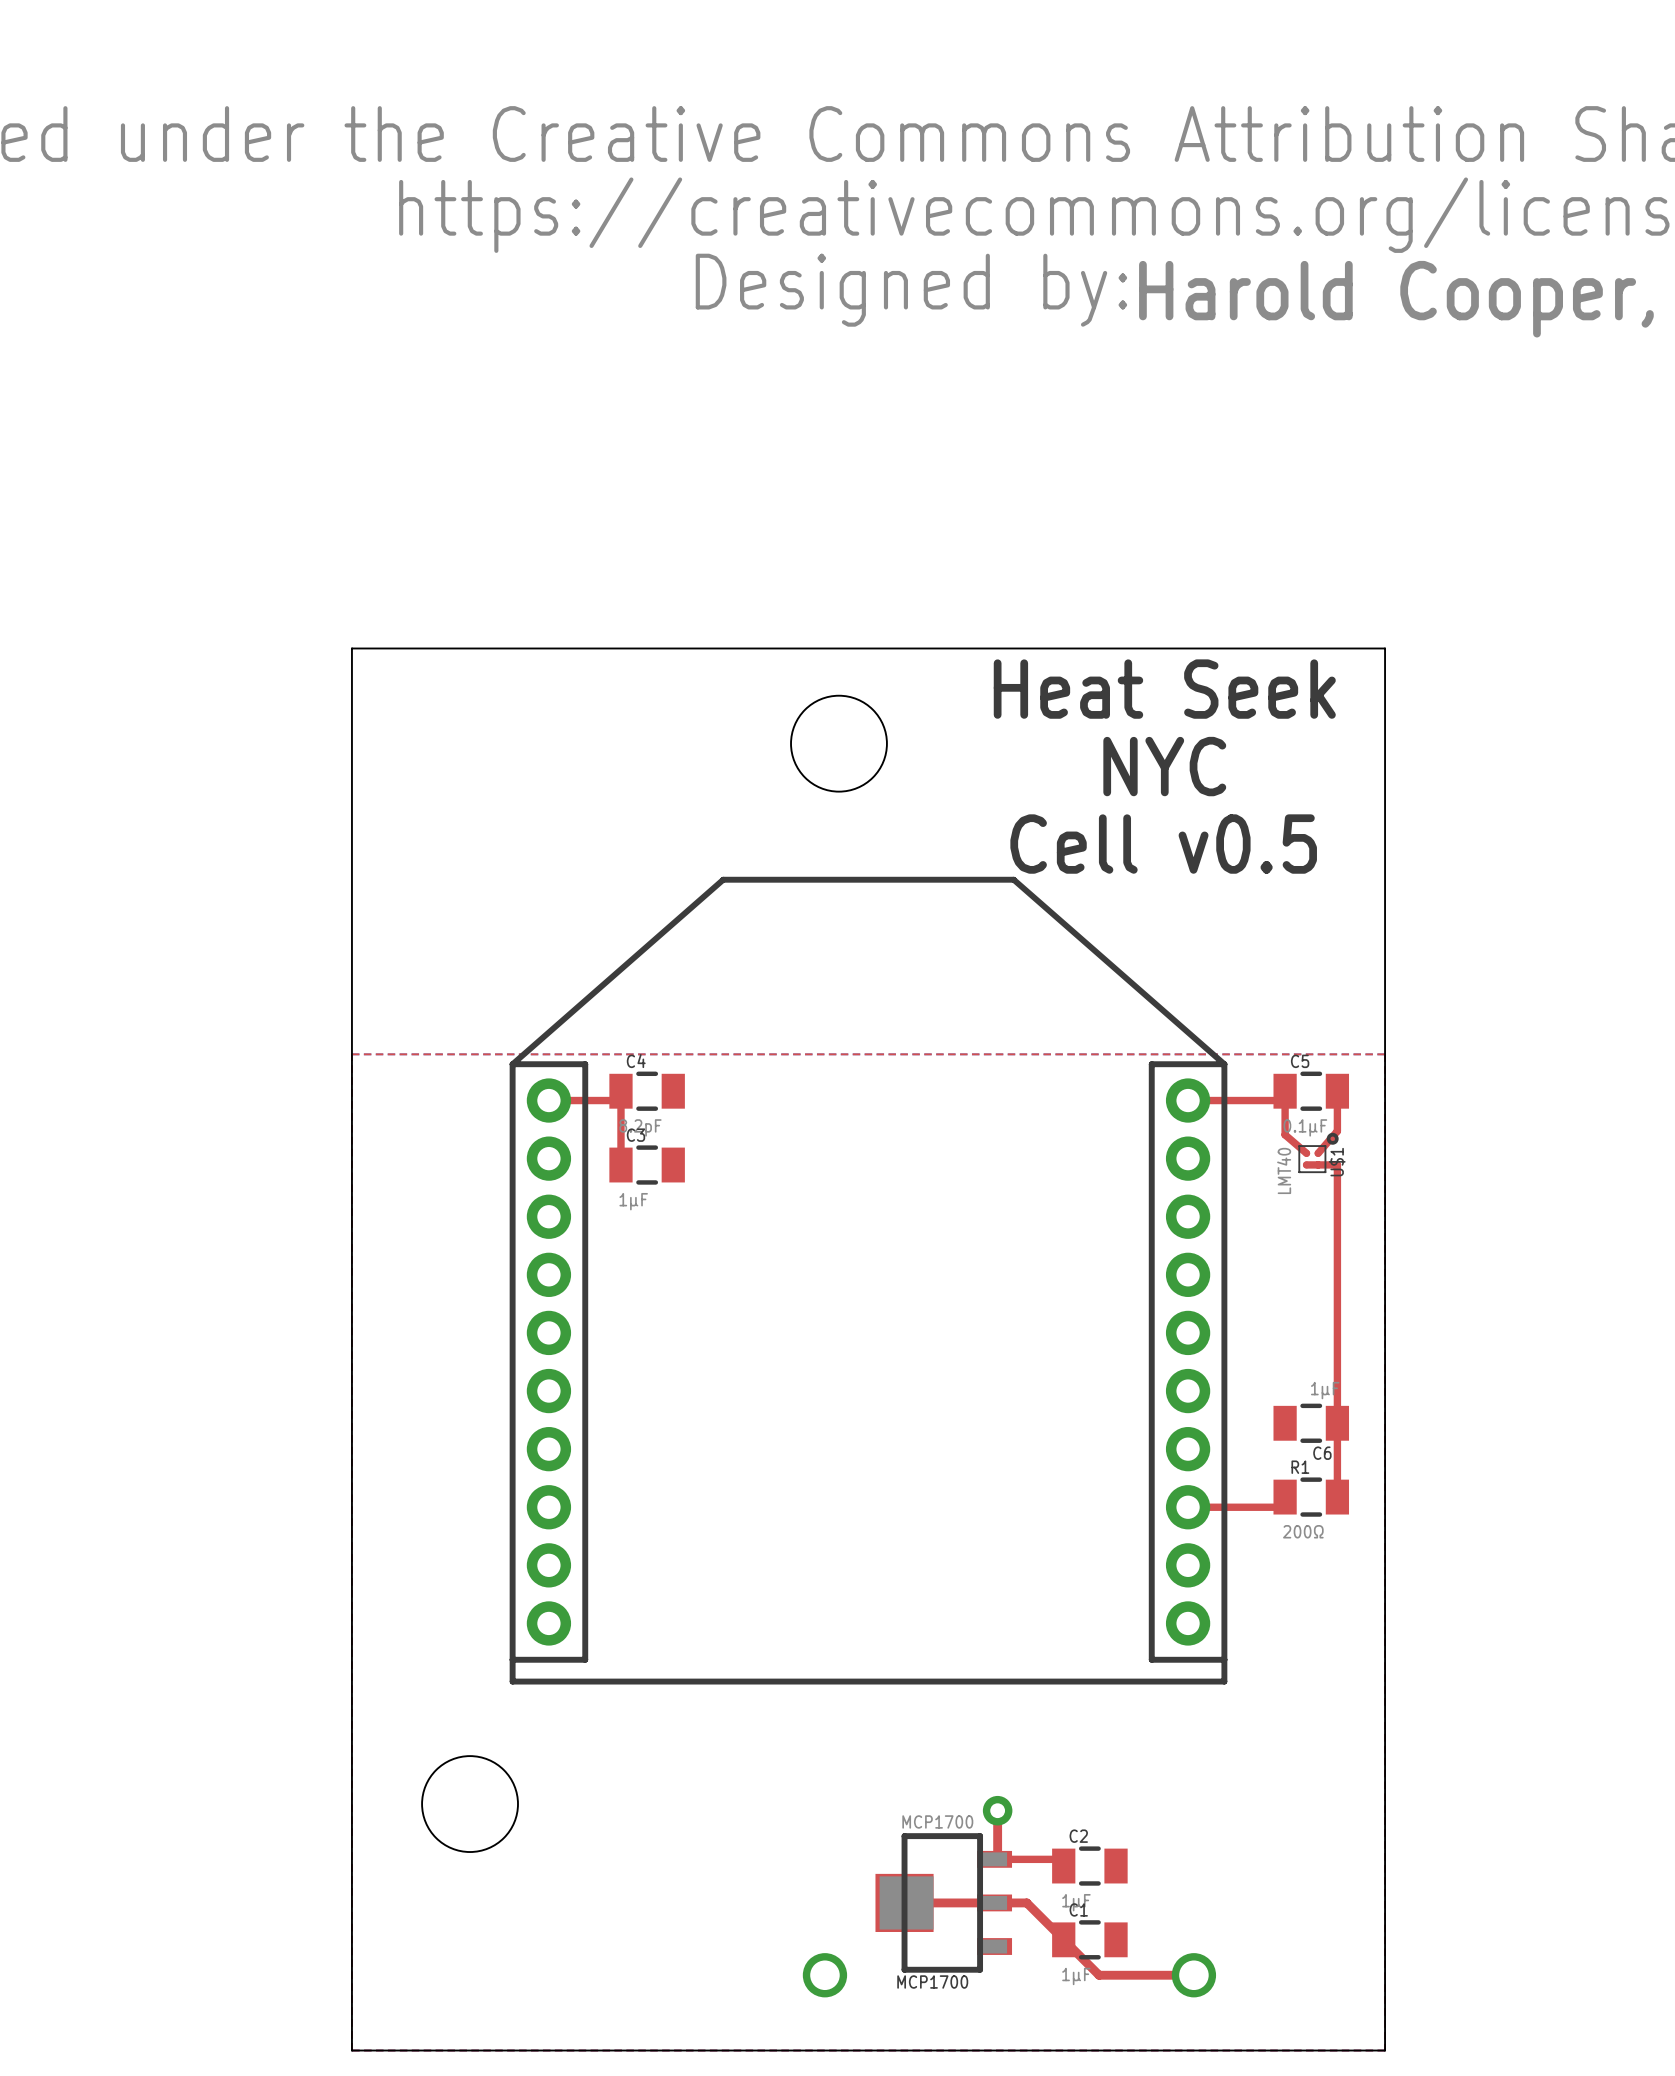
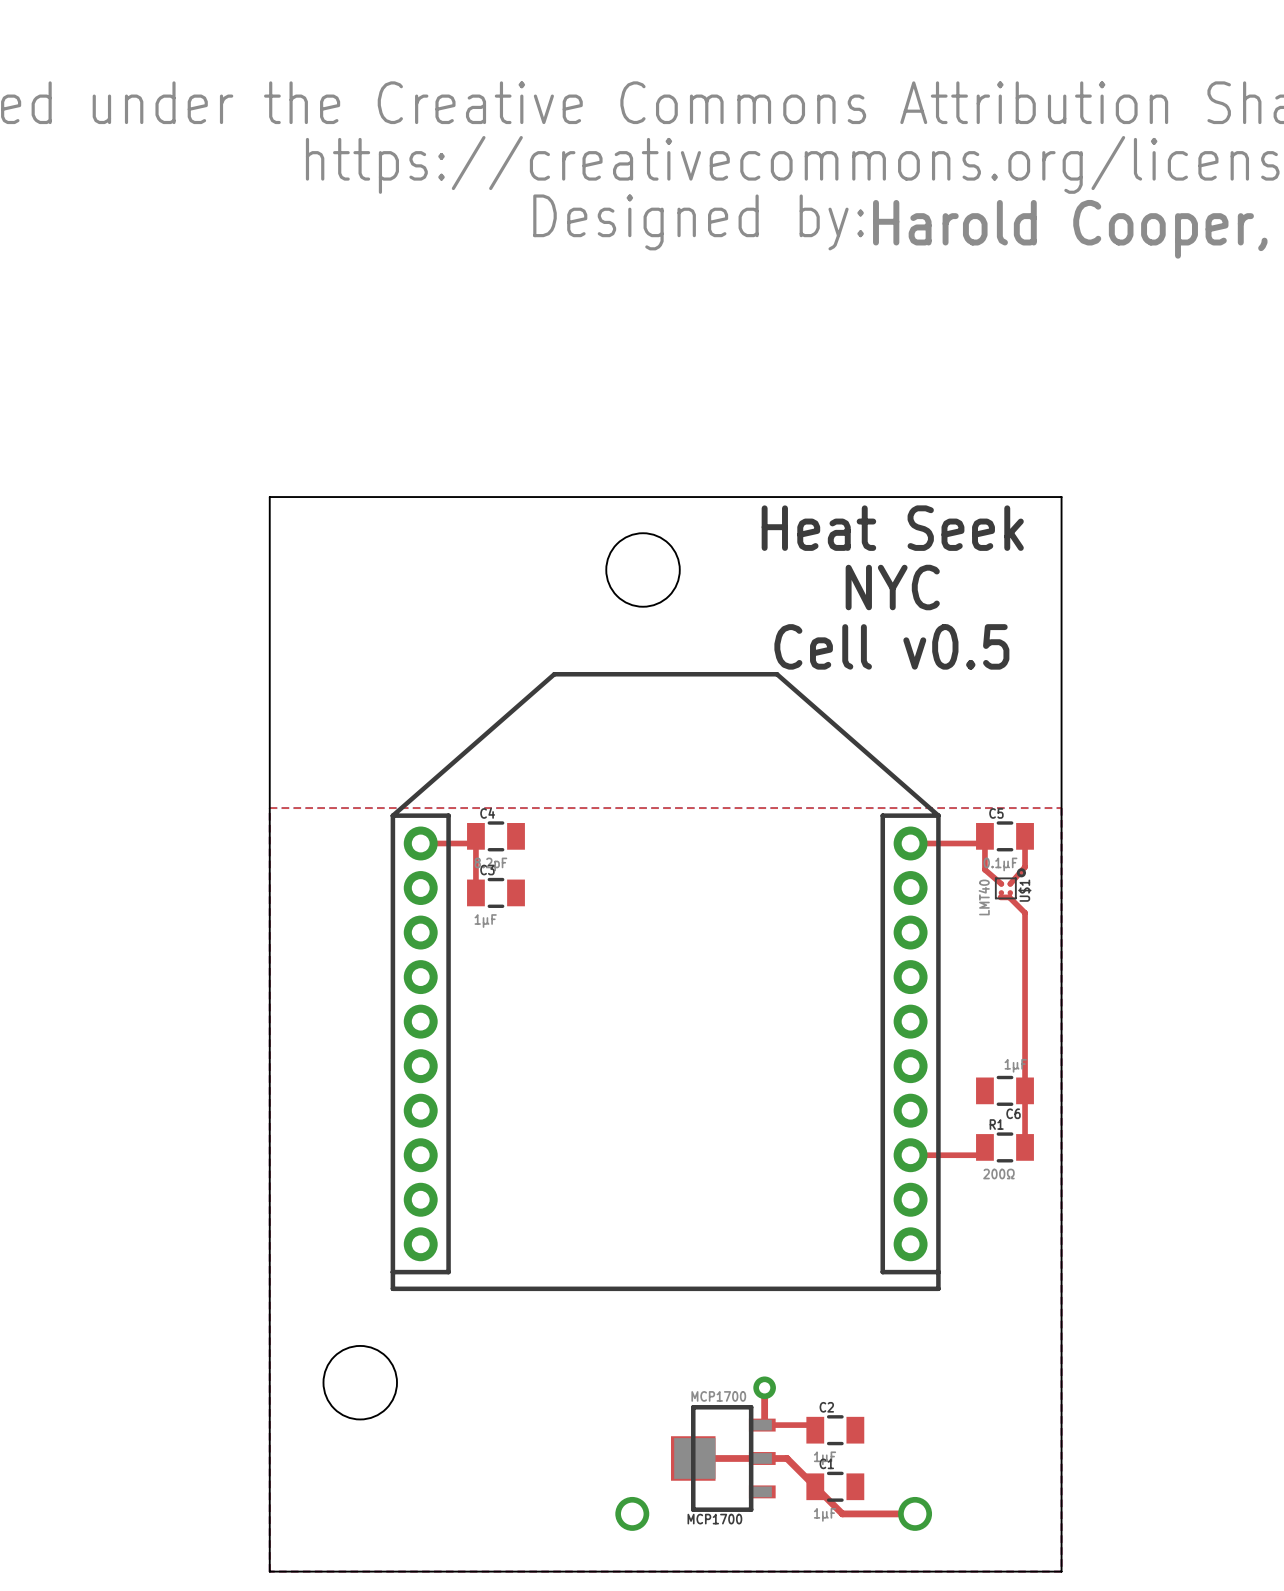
top track: (1306, 1164) (1337, 1164) (1337, 1191) -> (1000, 897) (1009, 897) (1025, 912)

